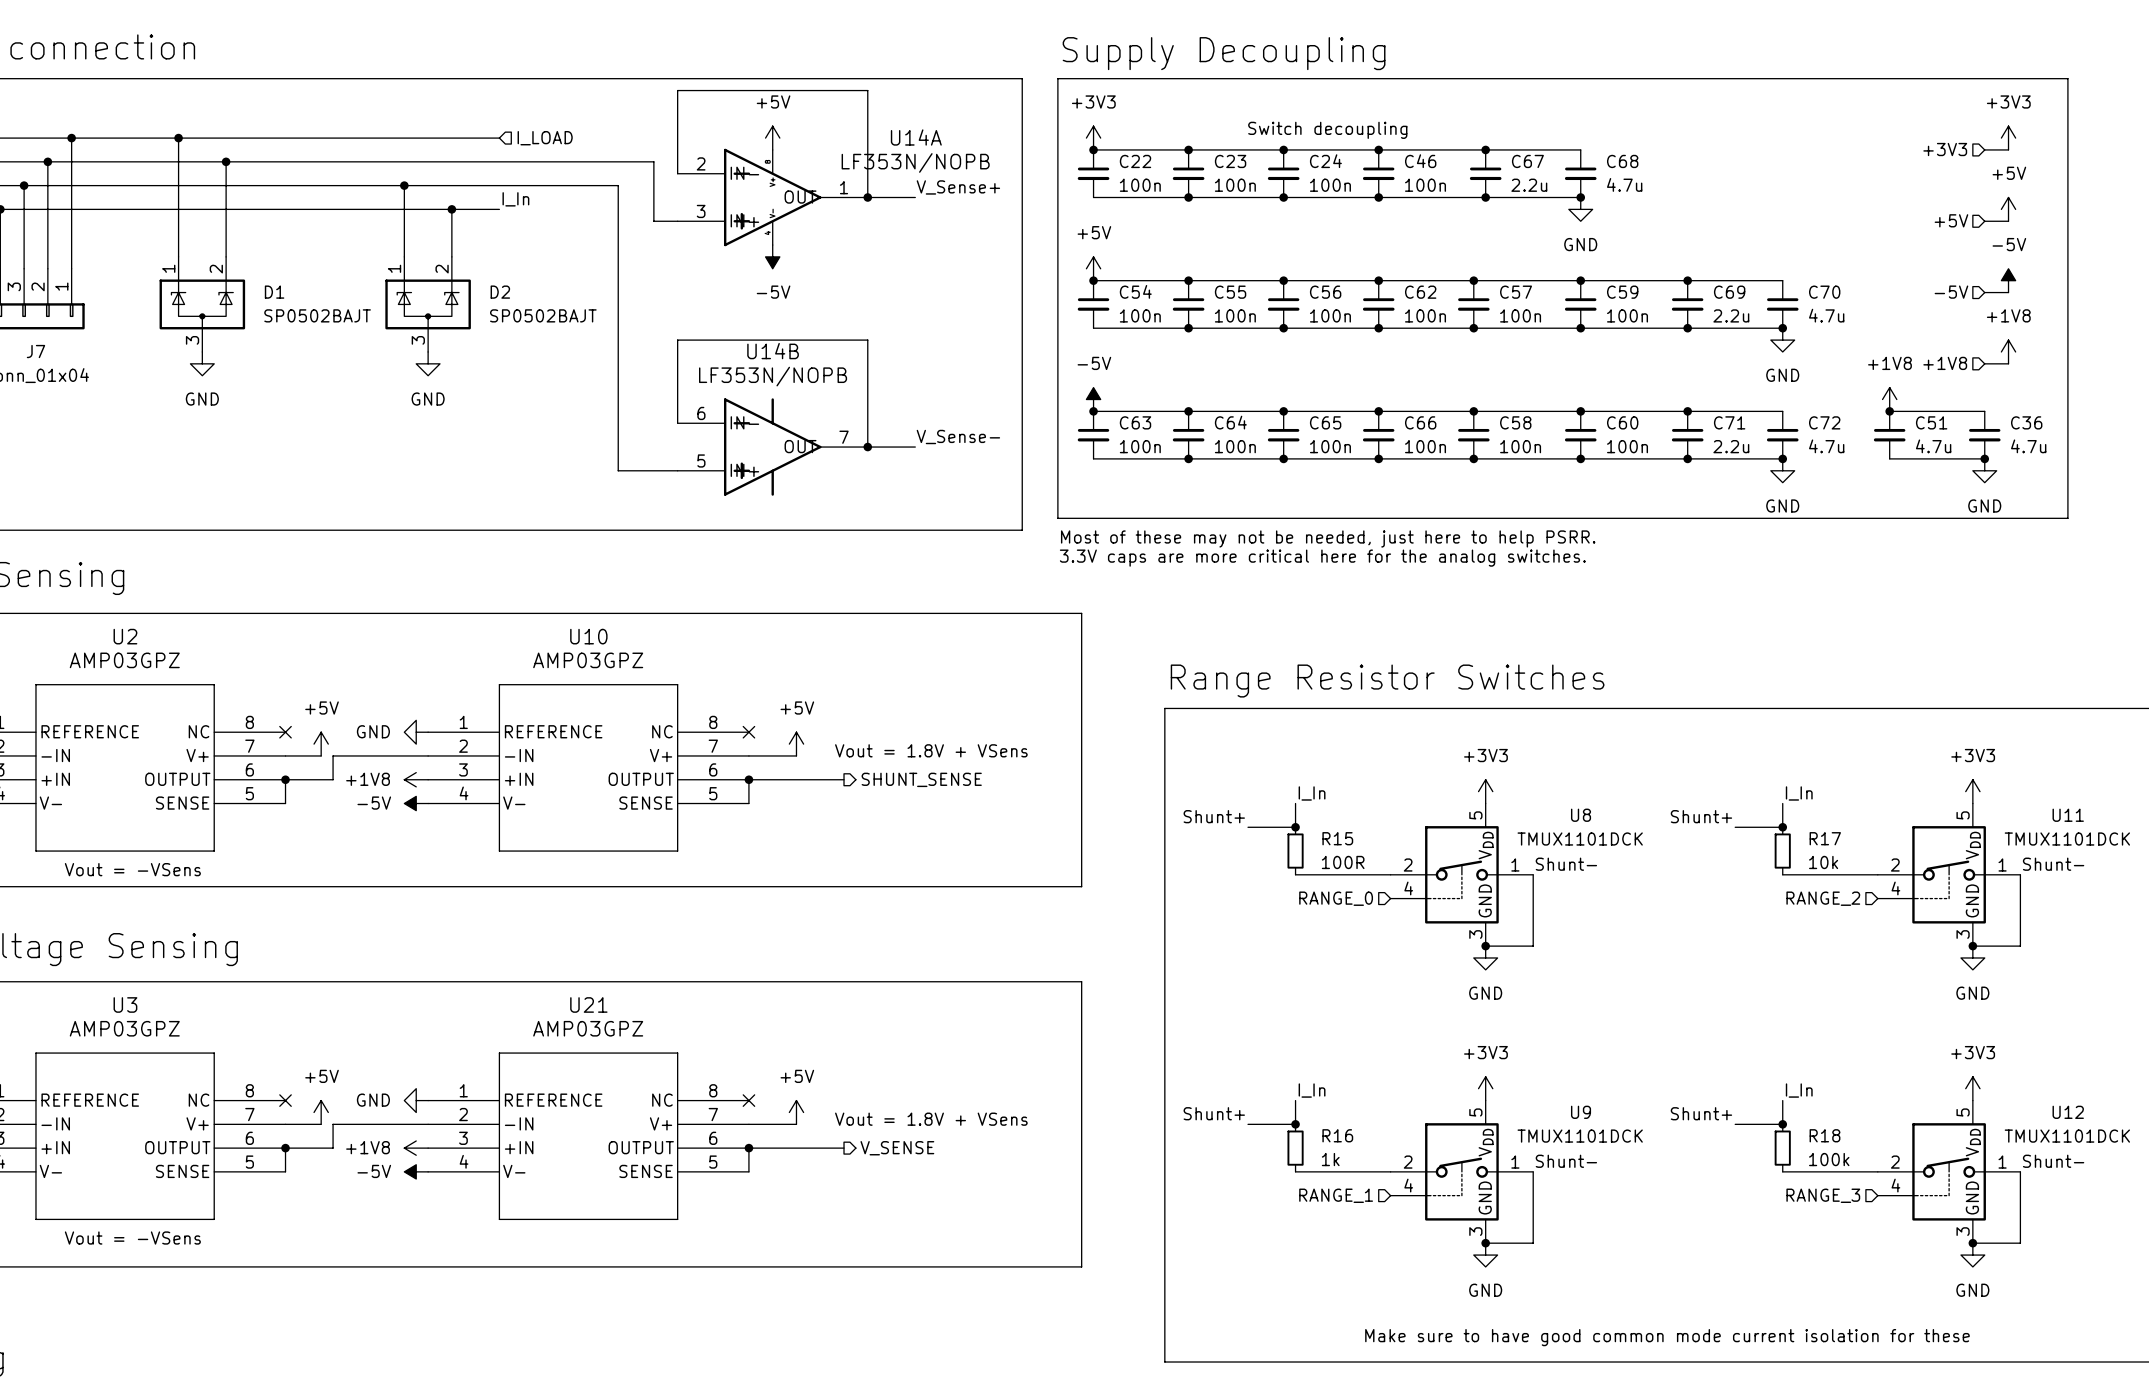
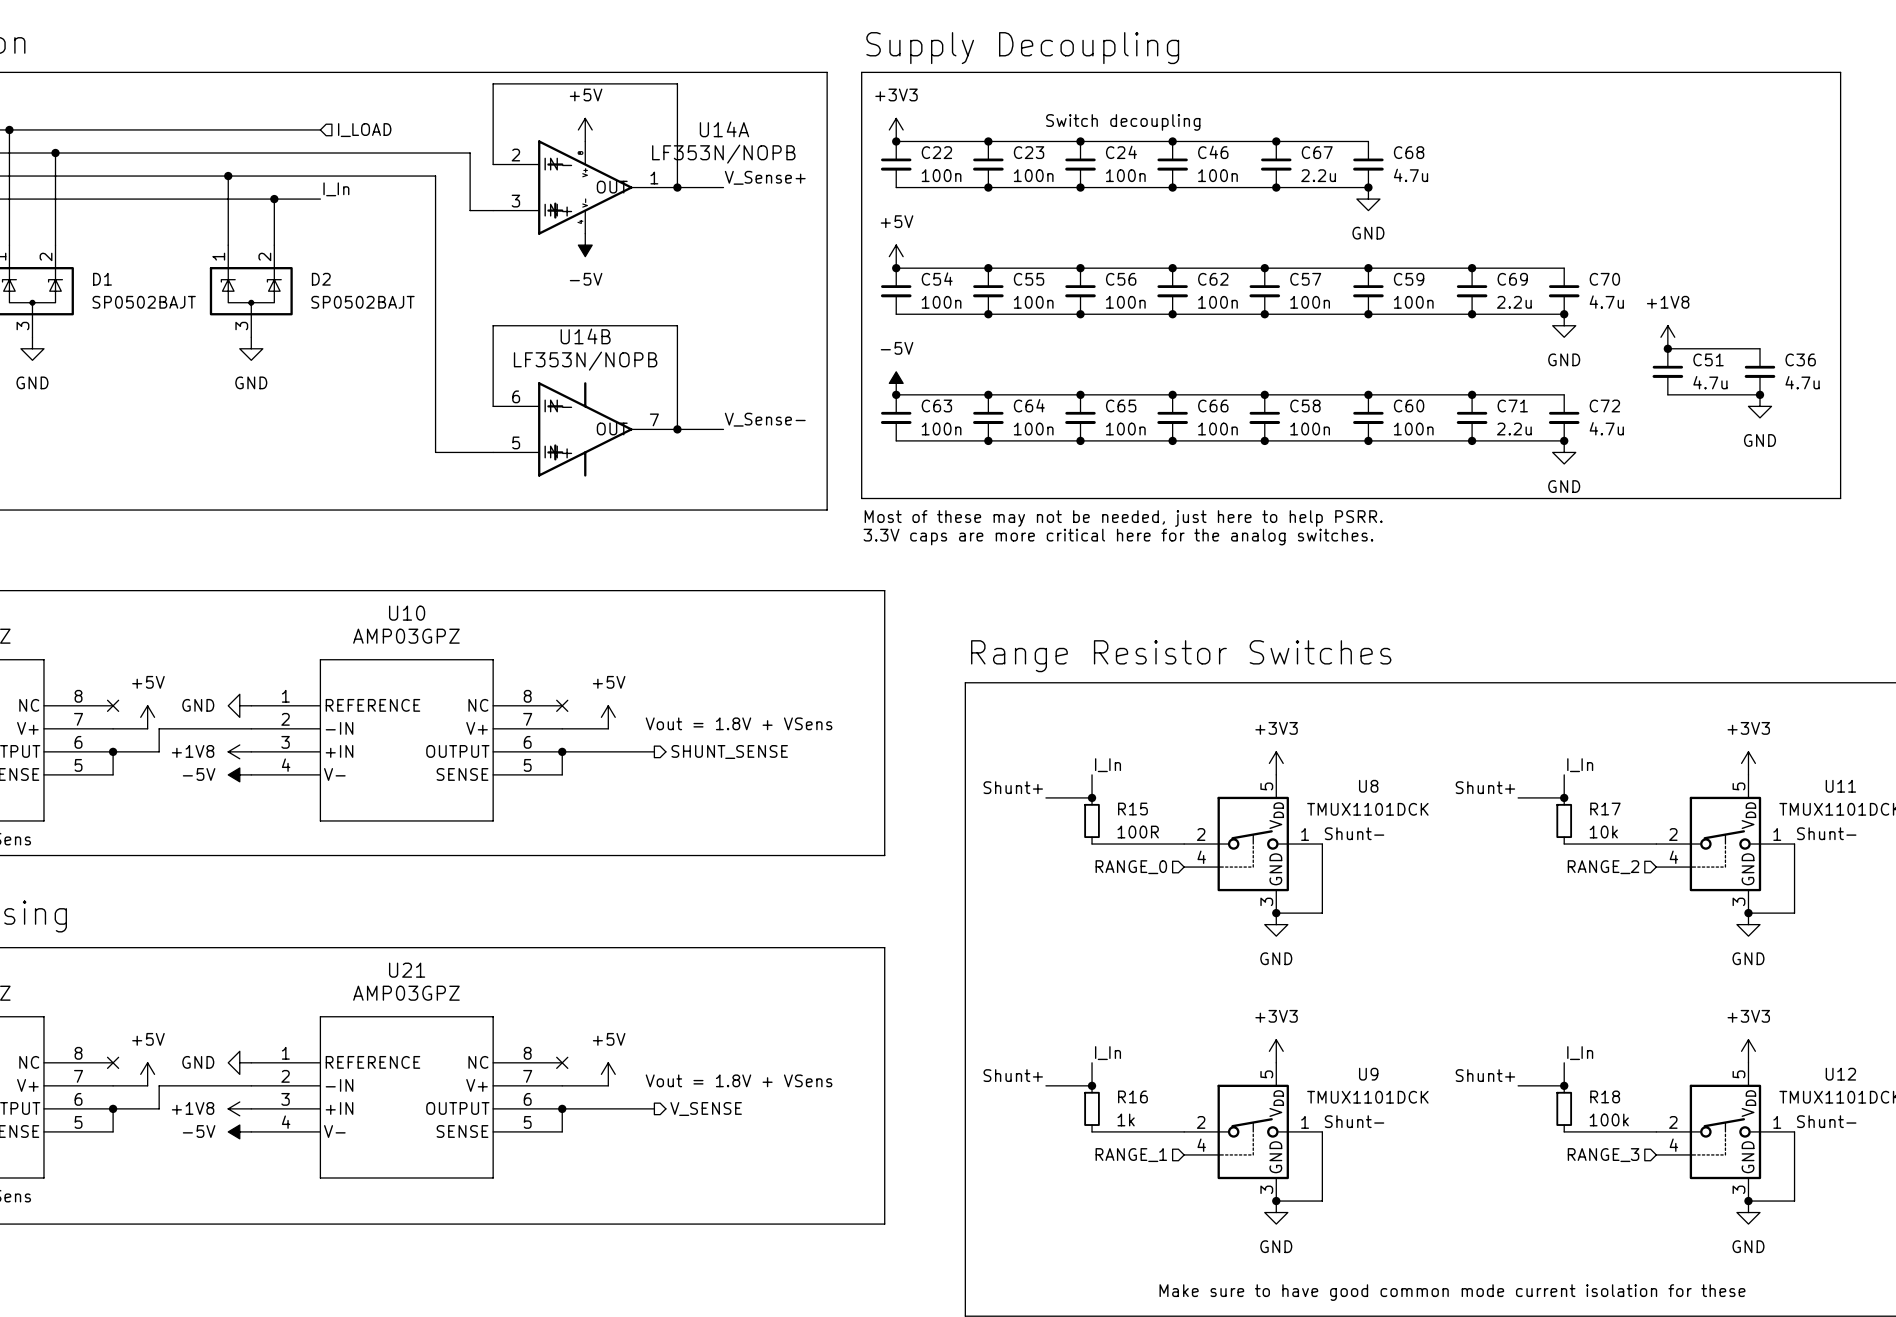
power symbol: +3V3 (2008, 138) -> none
hierarchical label: +3V3 (1945, 149) -> none
wire: (1984, 149) (2008, 149) -> none
power symbol: +5V (2008, 209) -> none
hierarchical label: +5V (1951, 220) -> none
wire: (1984, 221) (2008, 221) -> none
power symbol: -5V (2008, 280) -> none
hierarchical label: -5V (1951, 292) -> none
wire: (1984, 292) (2008, 292) -> none
power symbol: +1V8 (2008, 351) -> none
junction: none -> (1667, 348)
hierarchical label: +1V8 (1945, 363) -> none
wire: (1984, 363) (2008, 363) -> (1759, 348) (1667, 348)
power symbol position: +1V8 (1889, 399) -> +1V8 (1667, 337)
junction: (1889, 411) -> none
junction: none -> (1759, 394)
C51 position: (1889, 435) -> (1667, 371)
C36 position: (1984, 435) -> (1759, 371)
wire: (1889, 458) (1984, 458) -> none
junction: (1984, 458) -> none
power symbol position: GND (1984, 470) -> GND (1759, 406)

